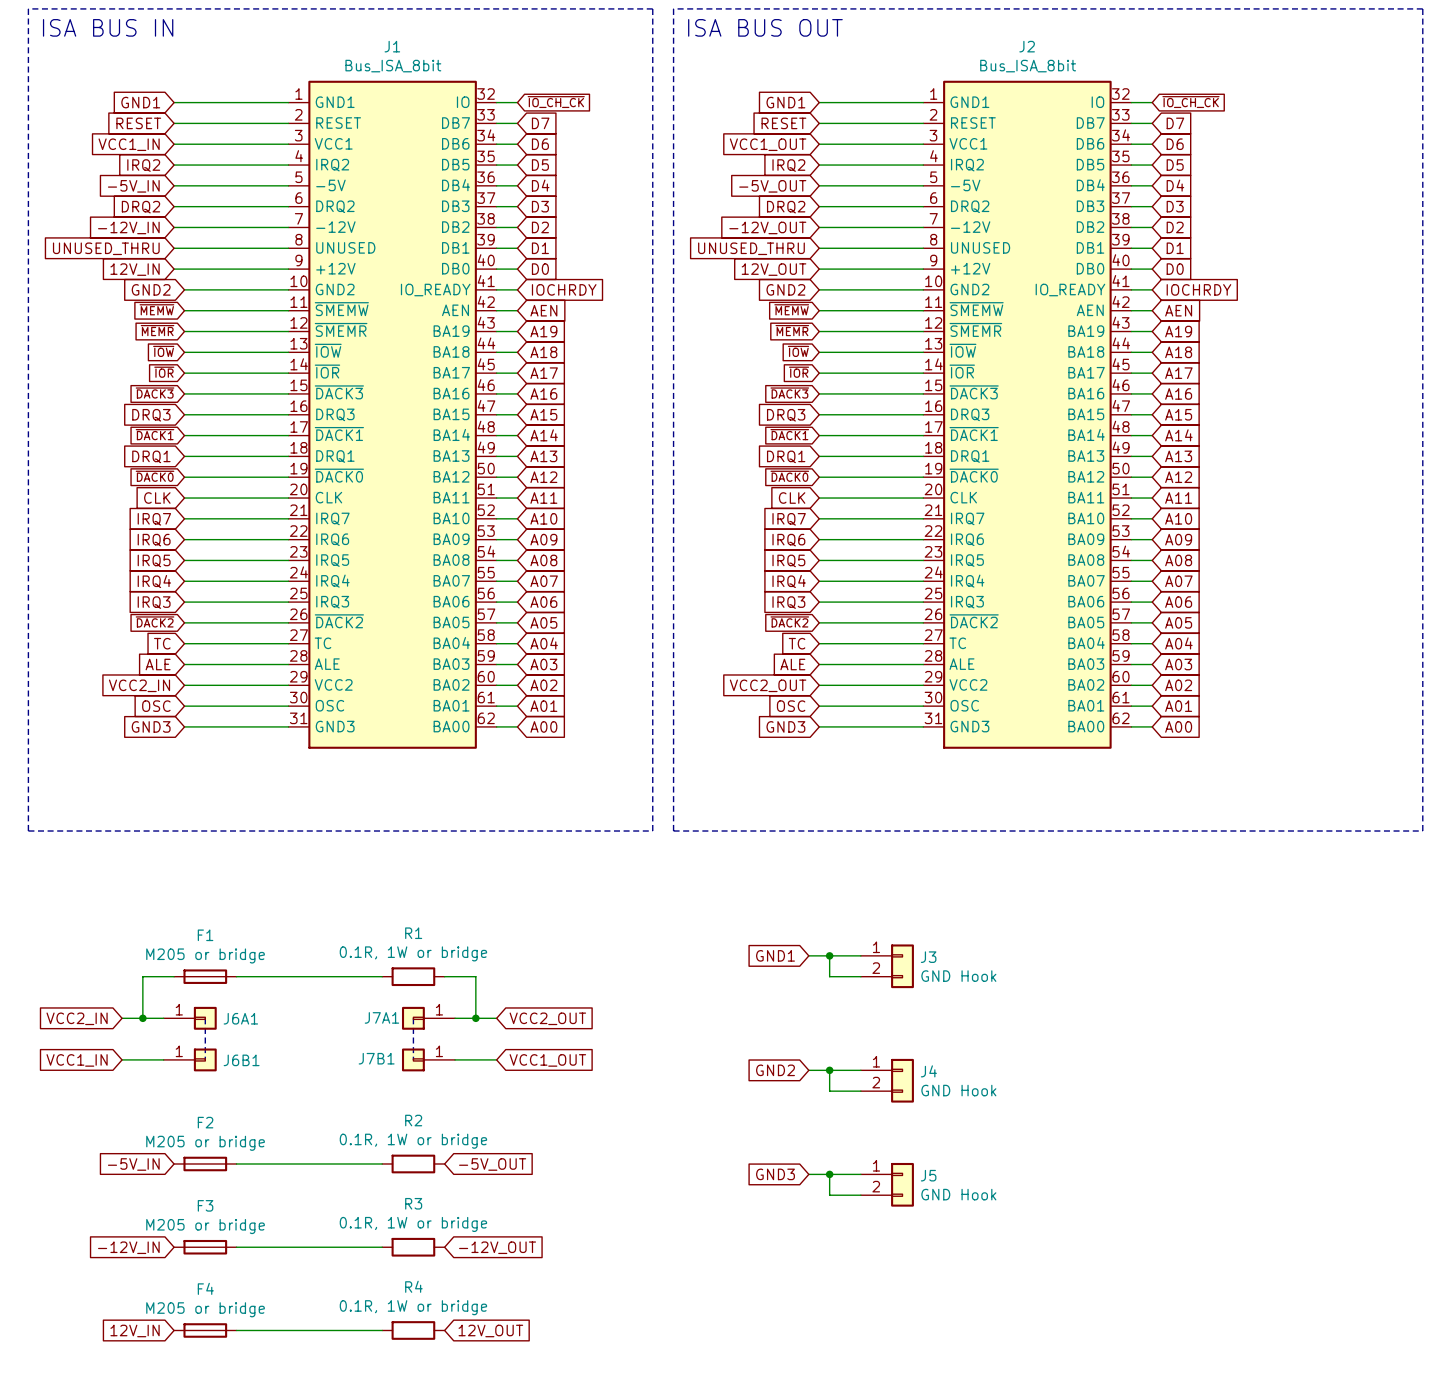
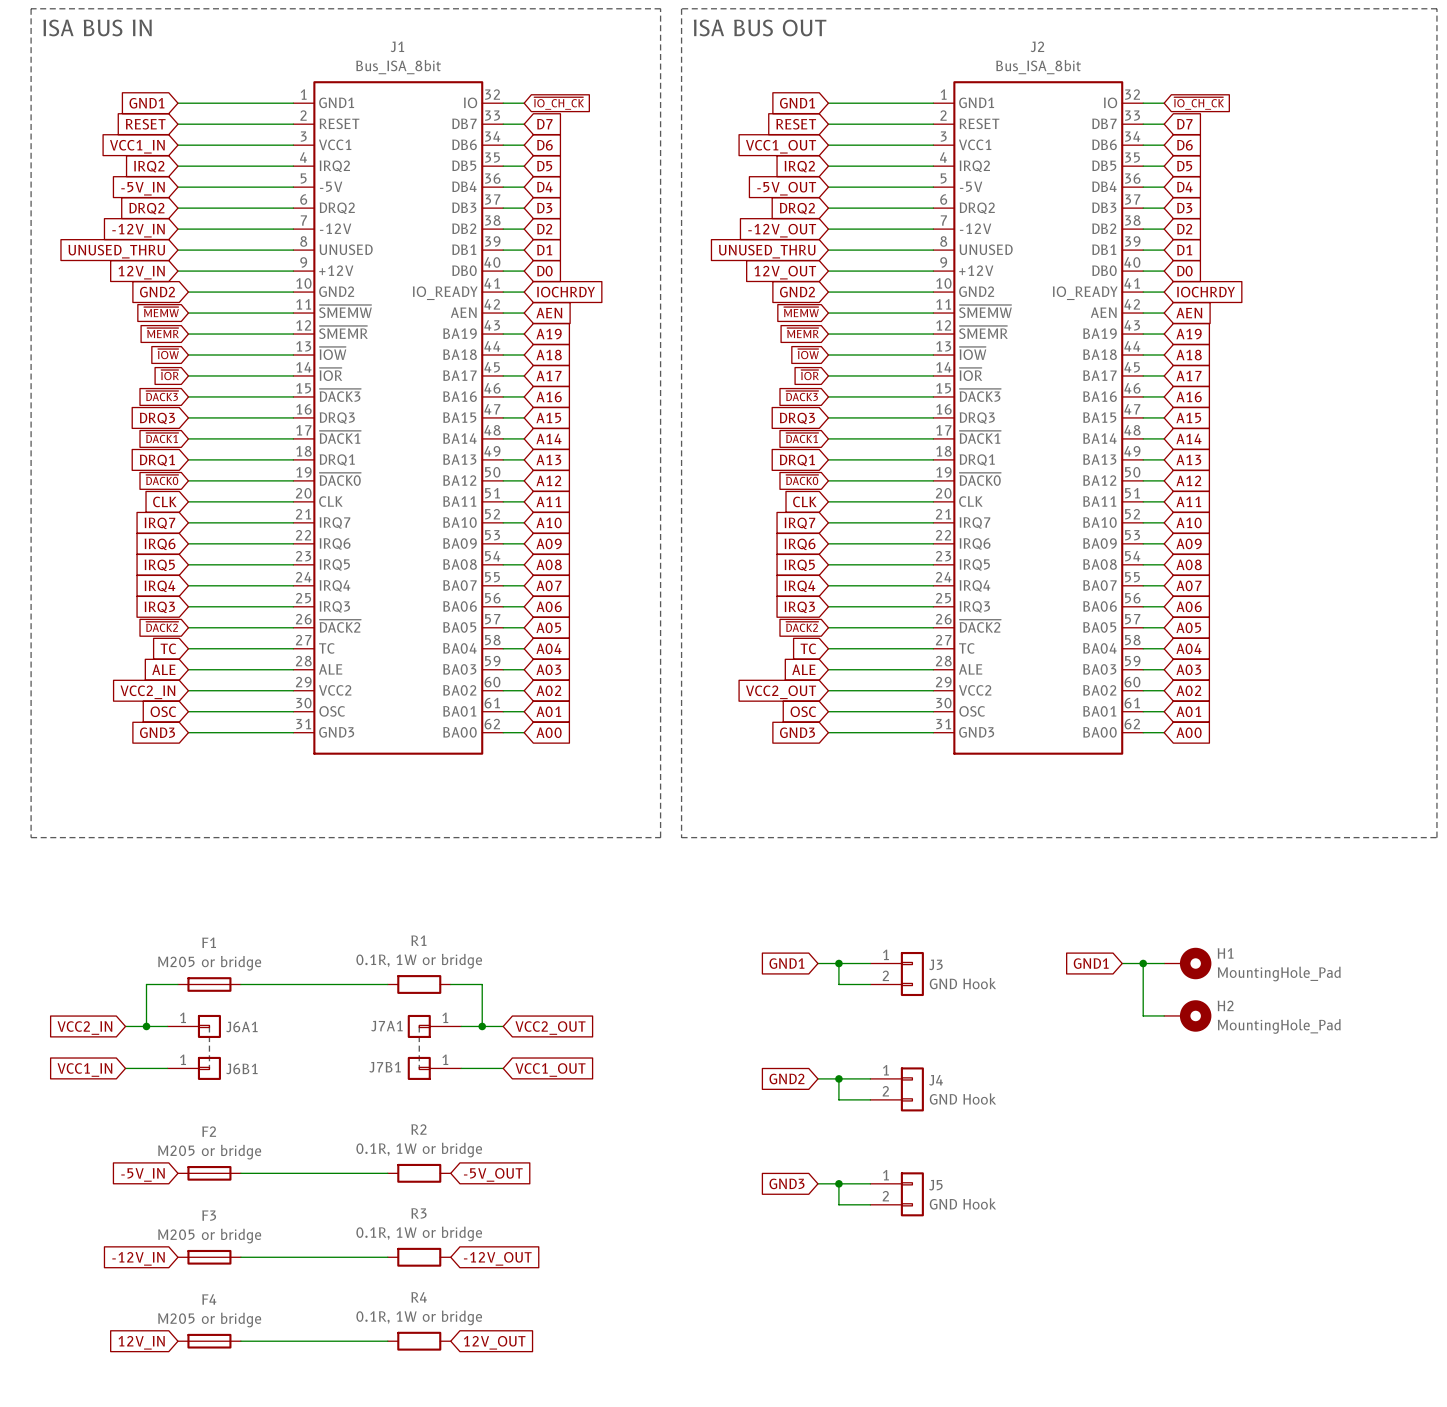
global label: none -> GND1 (1091, 963)
wire: none -> (1122, 963) (1164, 963)
wire: none -> (1143, 963) (1143, 1015) (1164, 1015)
junction: none -> (1143, 963)
H1: none -> MountingHole_Pad (1187, 963)
H2: none -> MountingHole_Pad (1187, 1015)

